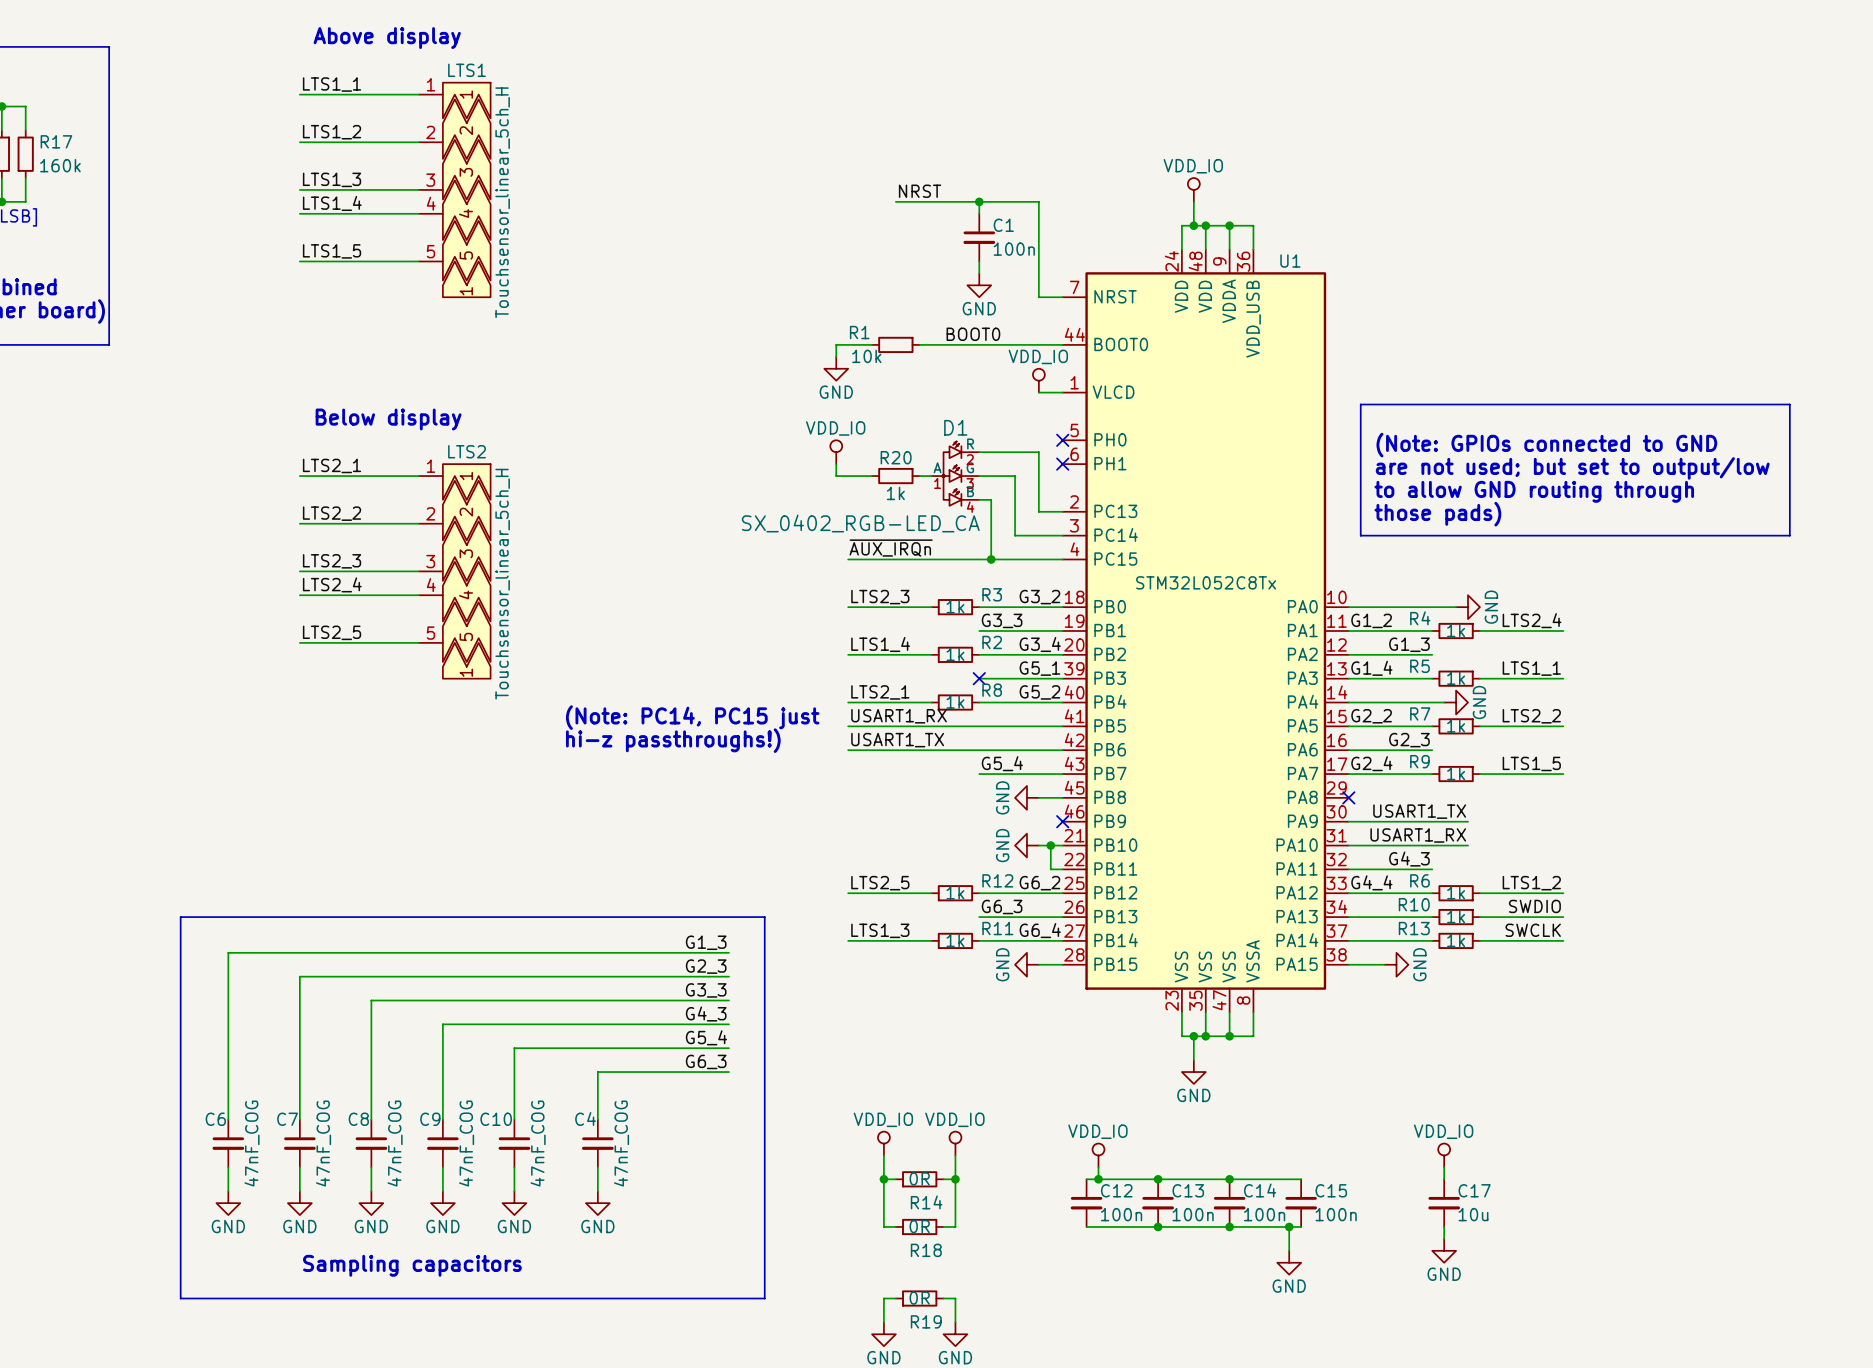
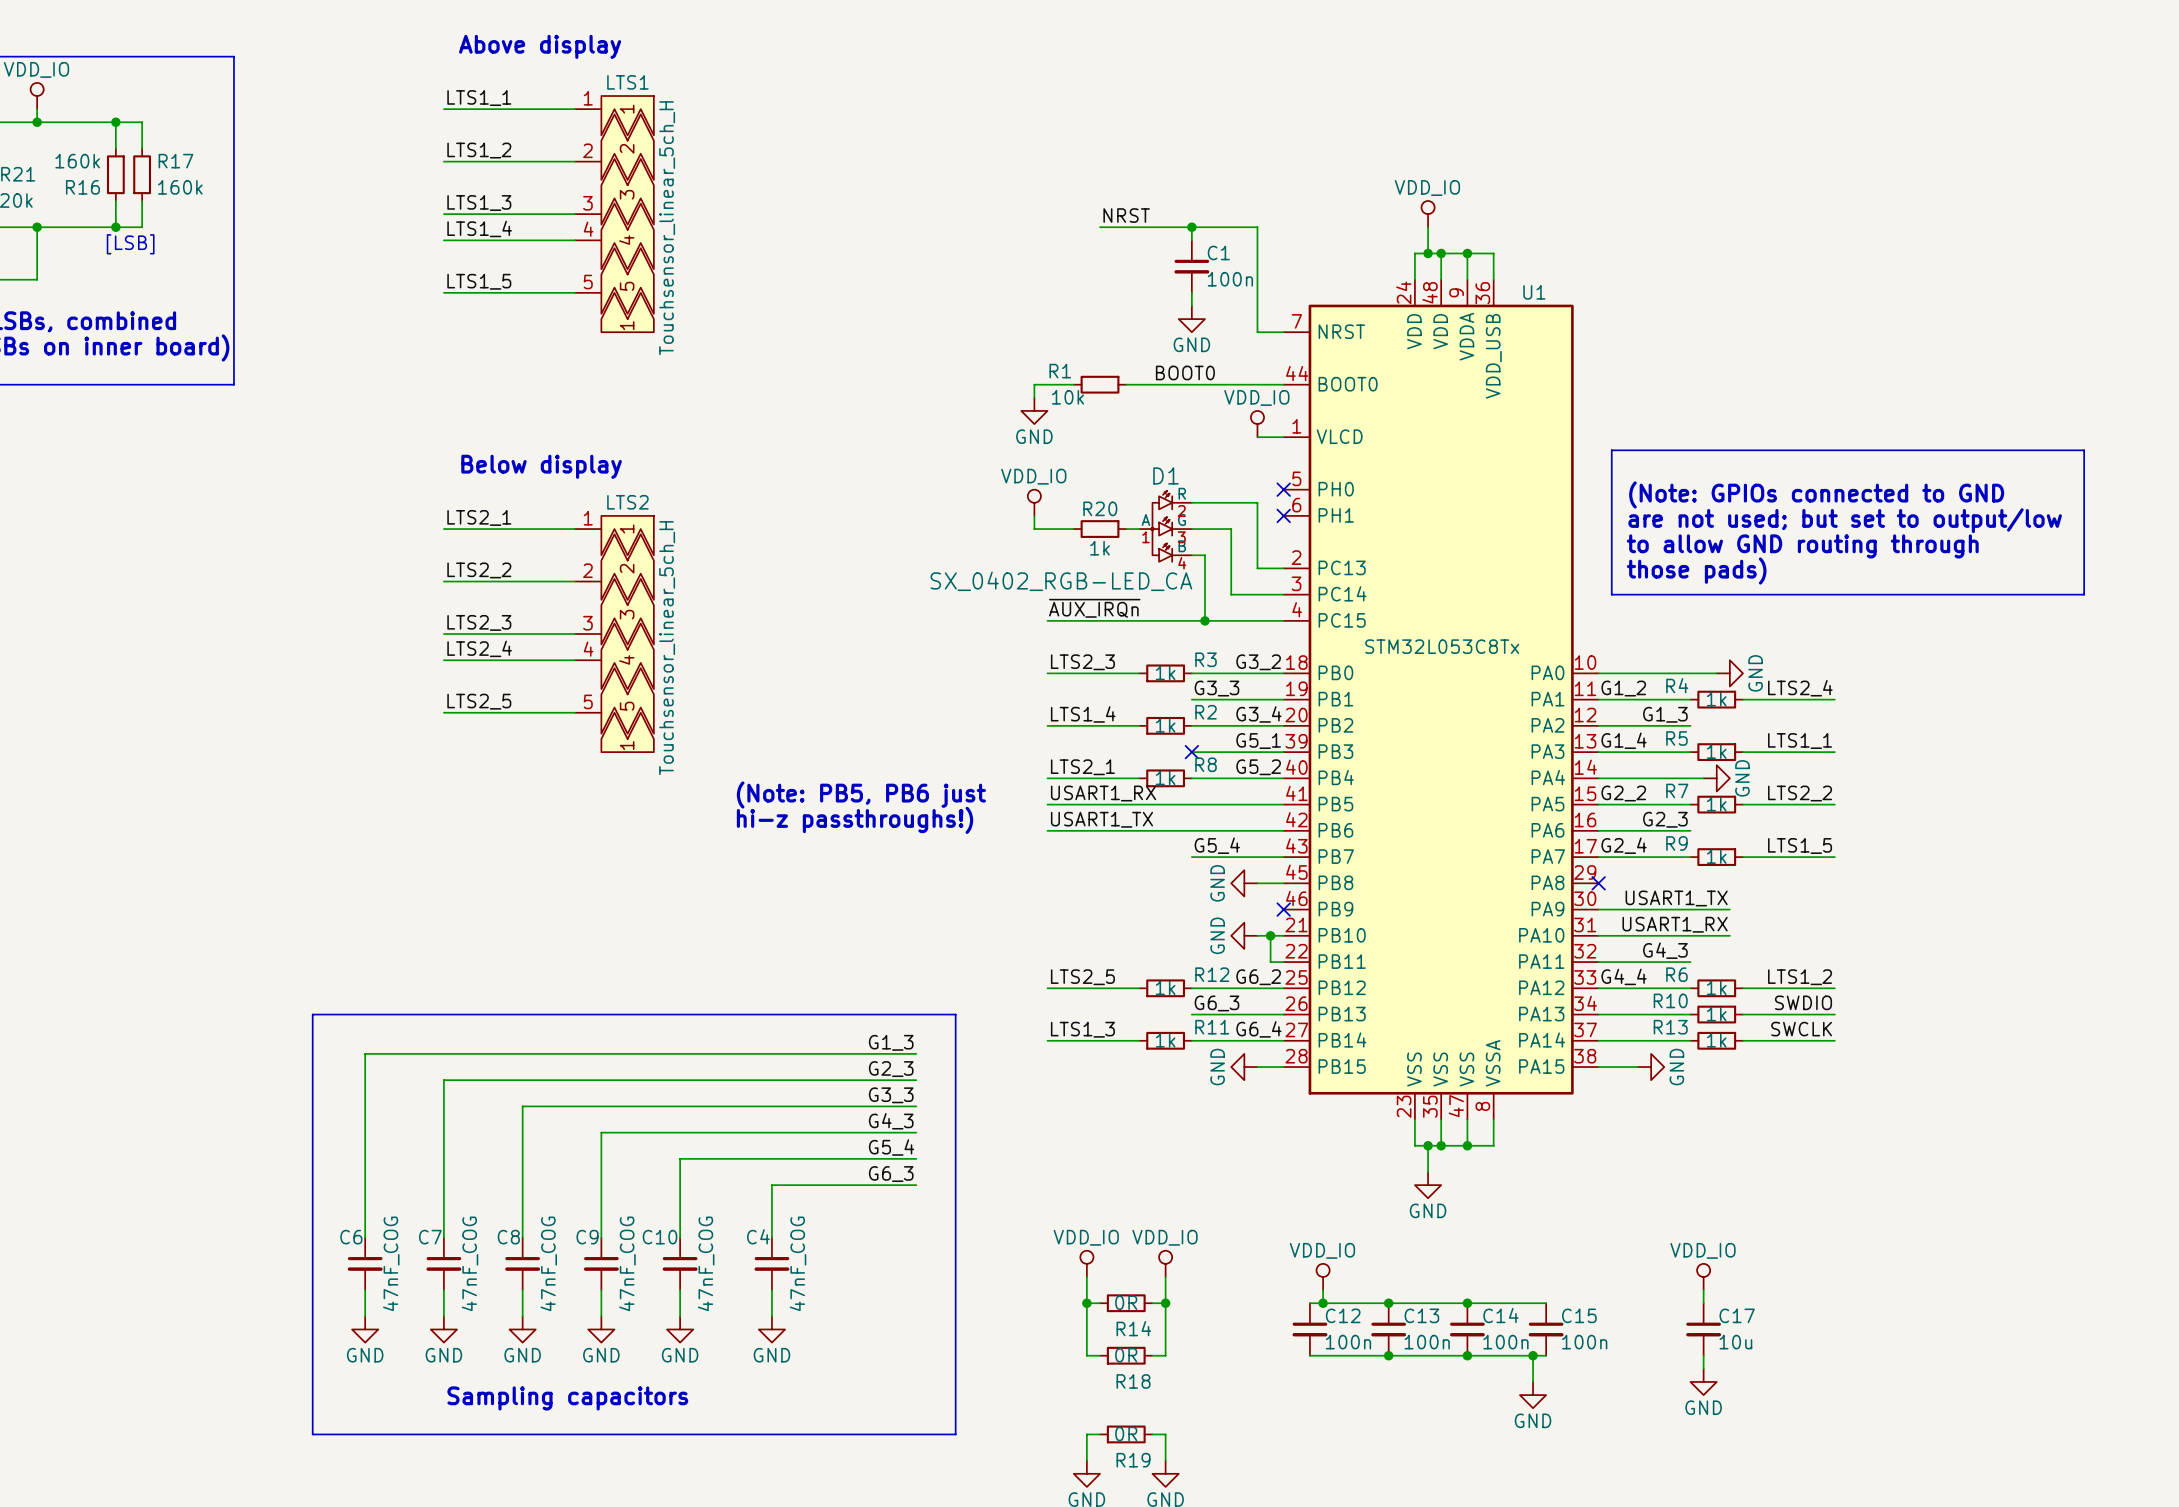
U1 value: STM32L052C8Tx (1206, 582) -> STM32L053C8Tx (1442, 646)
text: (Note: PC14, PC15 just (692, 717) -> (Note: PB5, PB6 just (861, 794)

